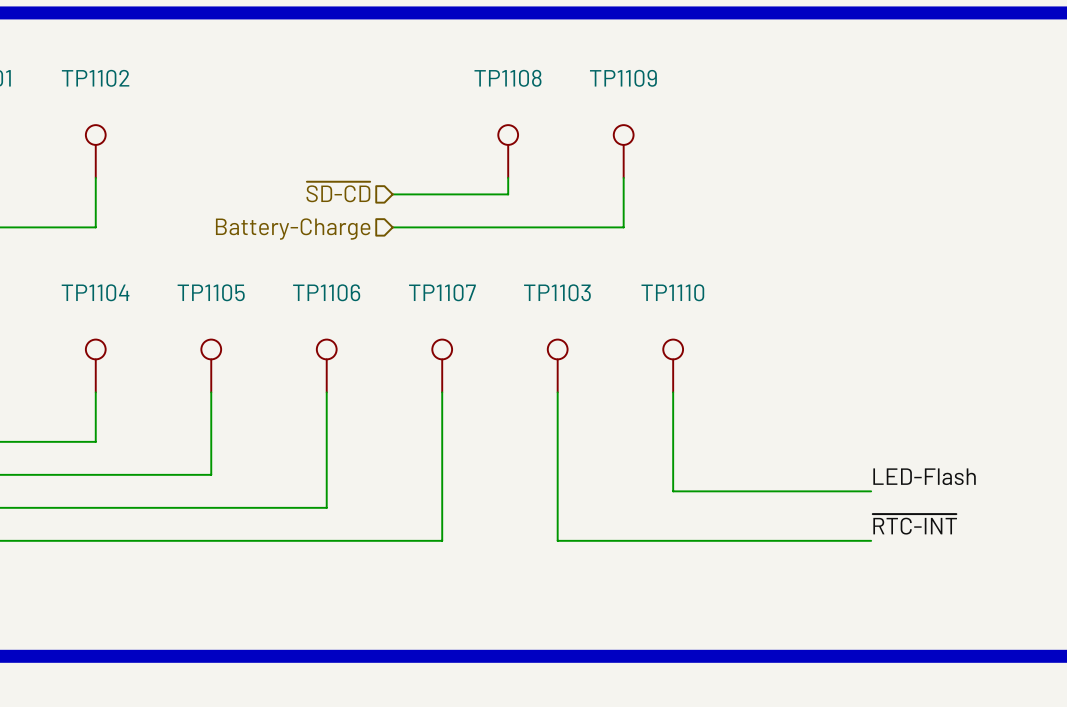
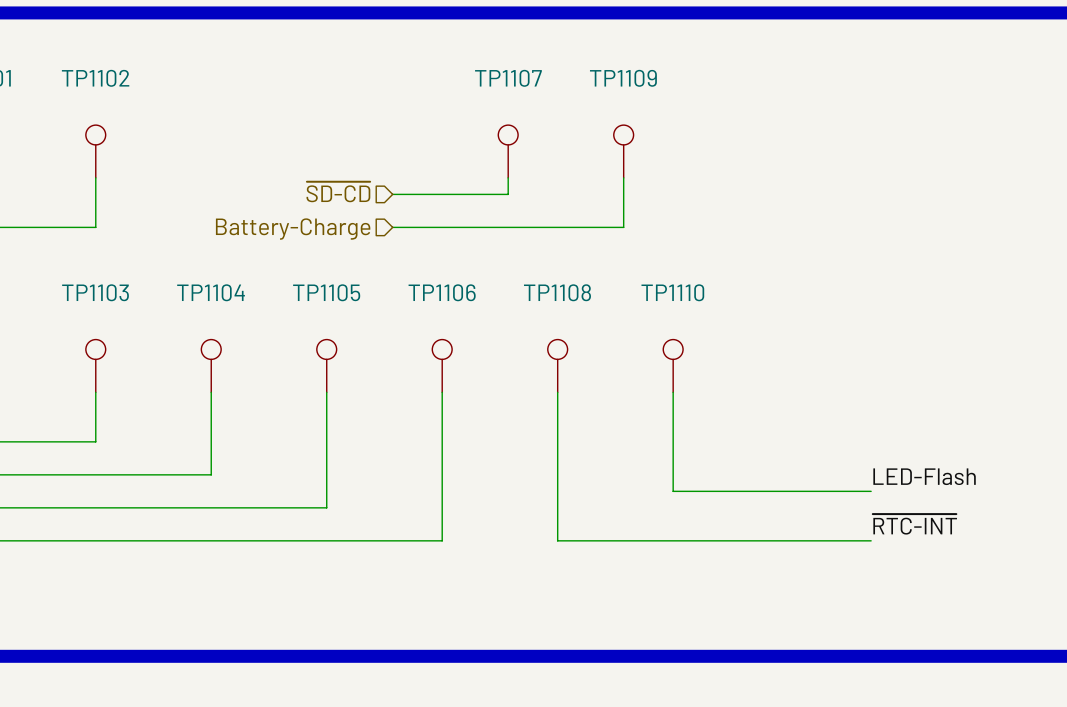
TP1108 name: TP1108 (507, 78) -> TP1107 (508, 78)
TP1104 name: TP1104 (95, 292) -> TP1103 (95, 292)
TP1105 name: TP1105 (211, 292) -> TP1104 (211, 292)
TP1106 name: TP1106 (326, 292) -> TP1105 (326, 292)
TP1107 name: TP1107 (442, 292) -> TP1106 (442, 292)
TP1103 name: TP1103 (557, 292) -> TP1108 (557, 292)

